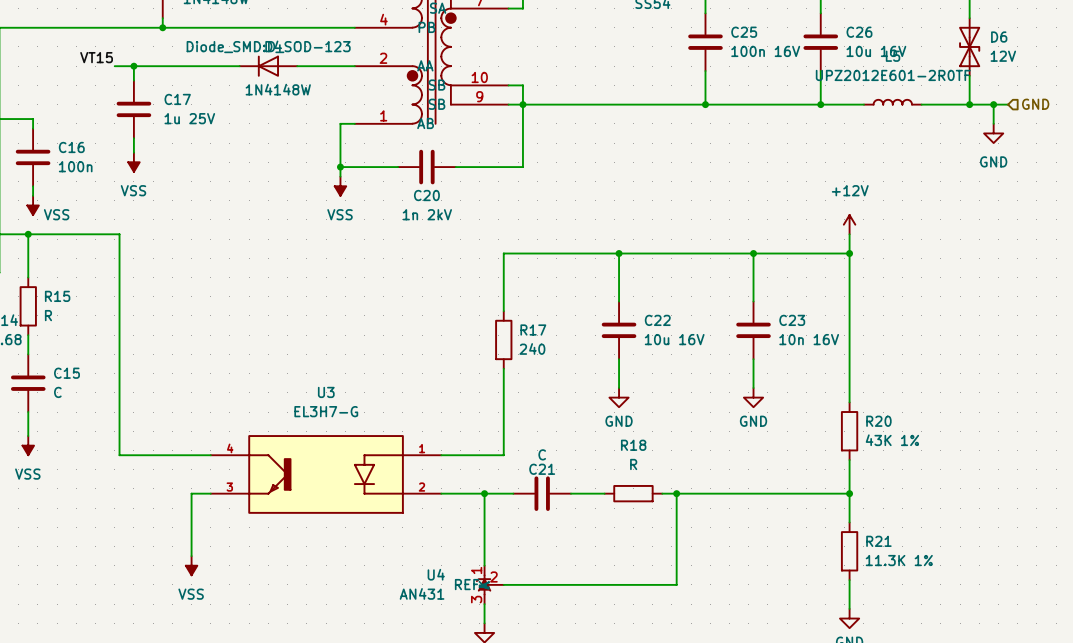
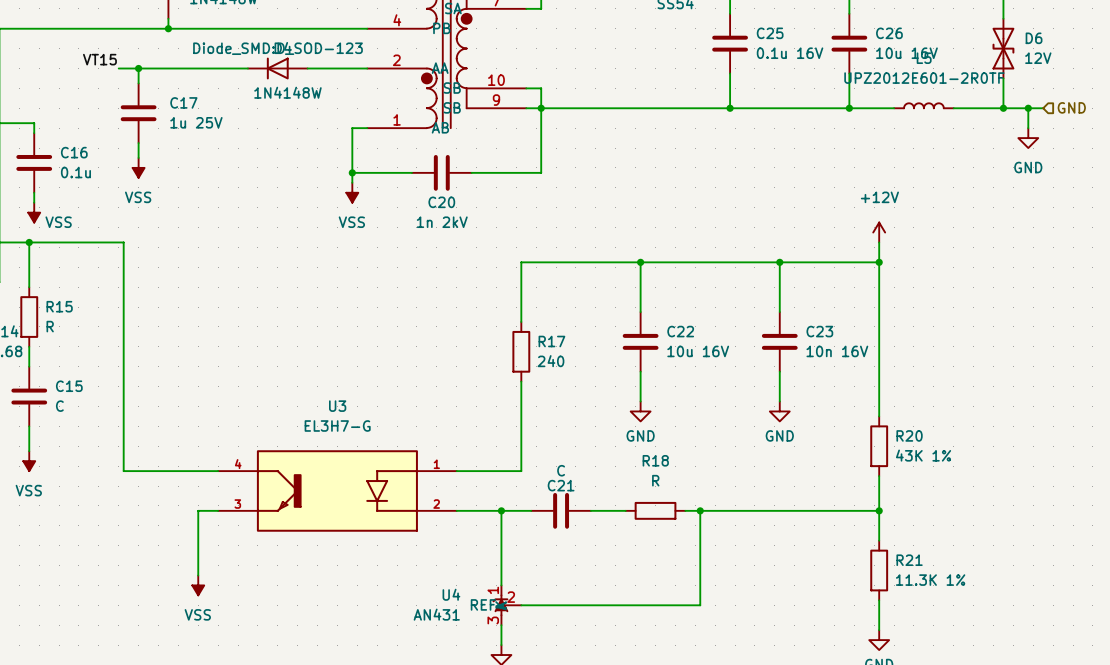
C25 value: 100n 16V (765, 51) -> 0.1u 16V (790, 53)
C16 value: 100n (75, 166) -> 0.1u (75, 172)

